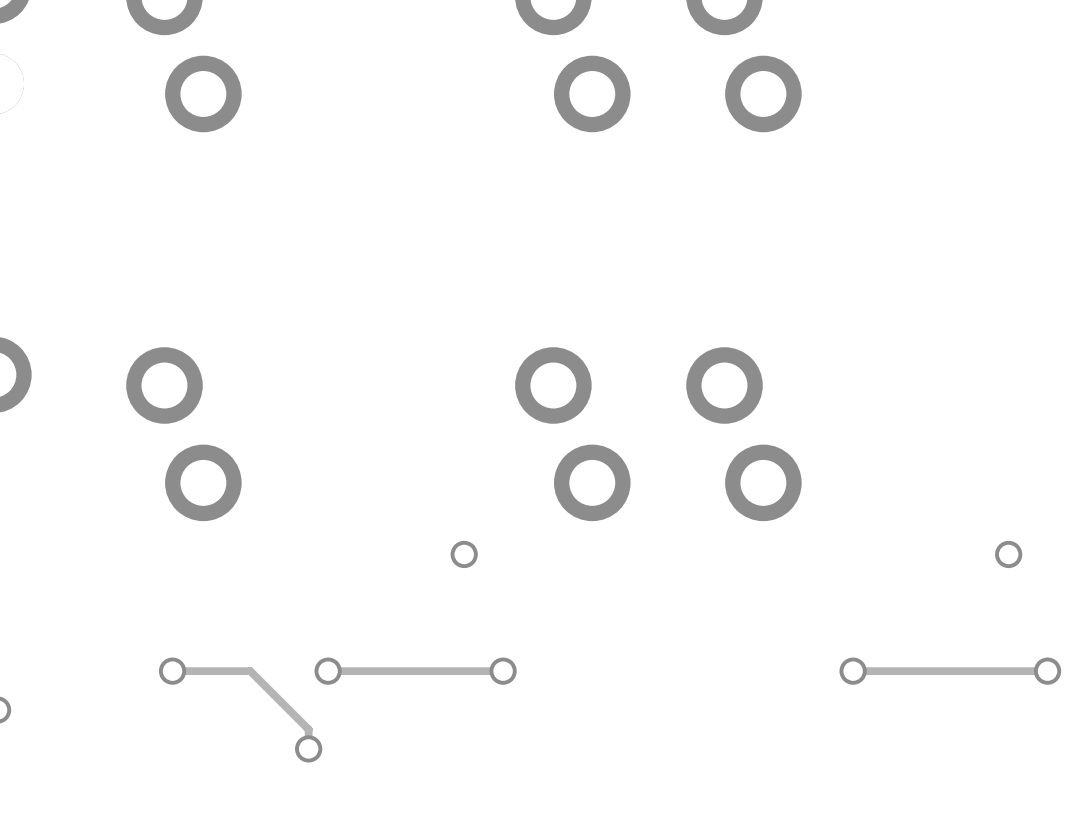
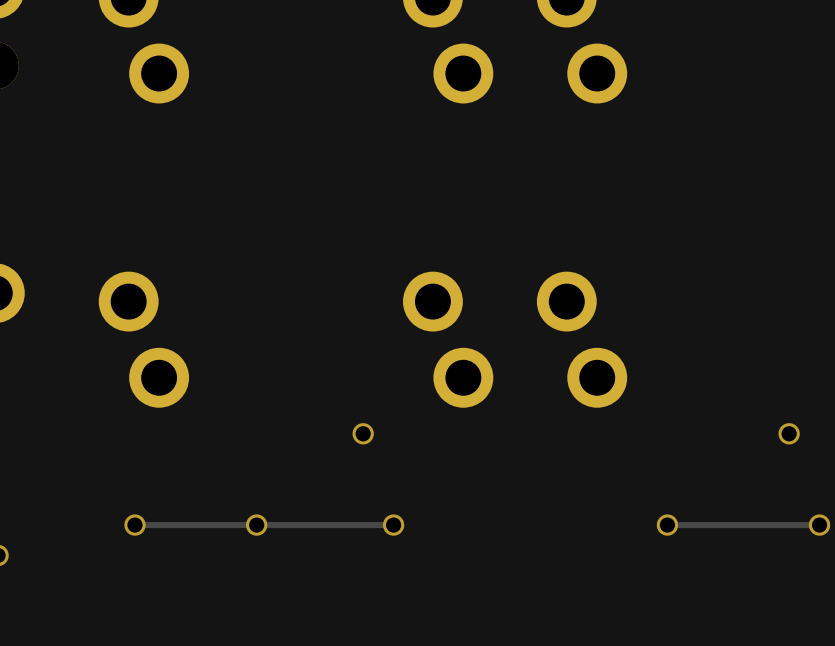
track: (250, 671) (308, 729) (308, 748) -> (195, 525) (256, 525)
via: (308, 748) -> none

